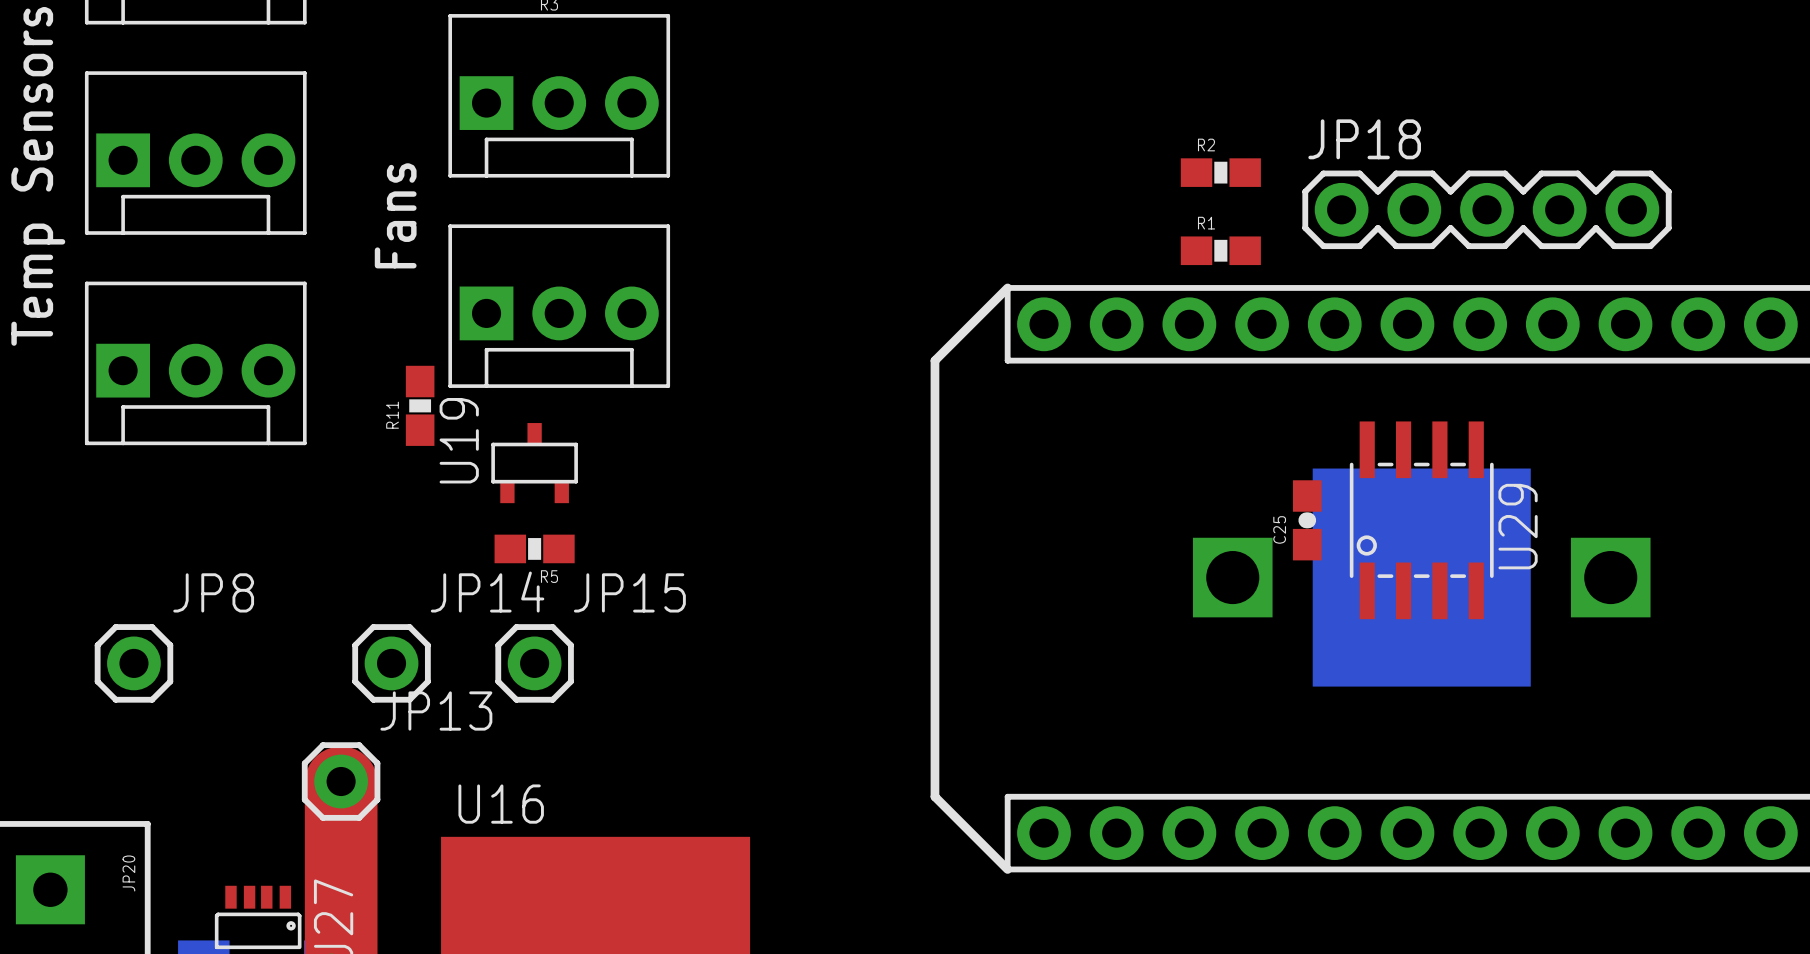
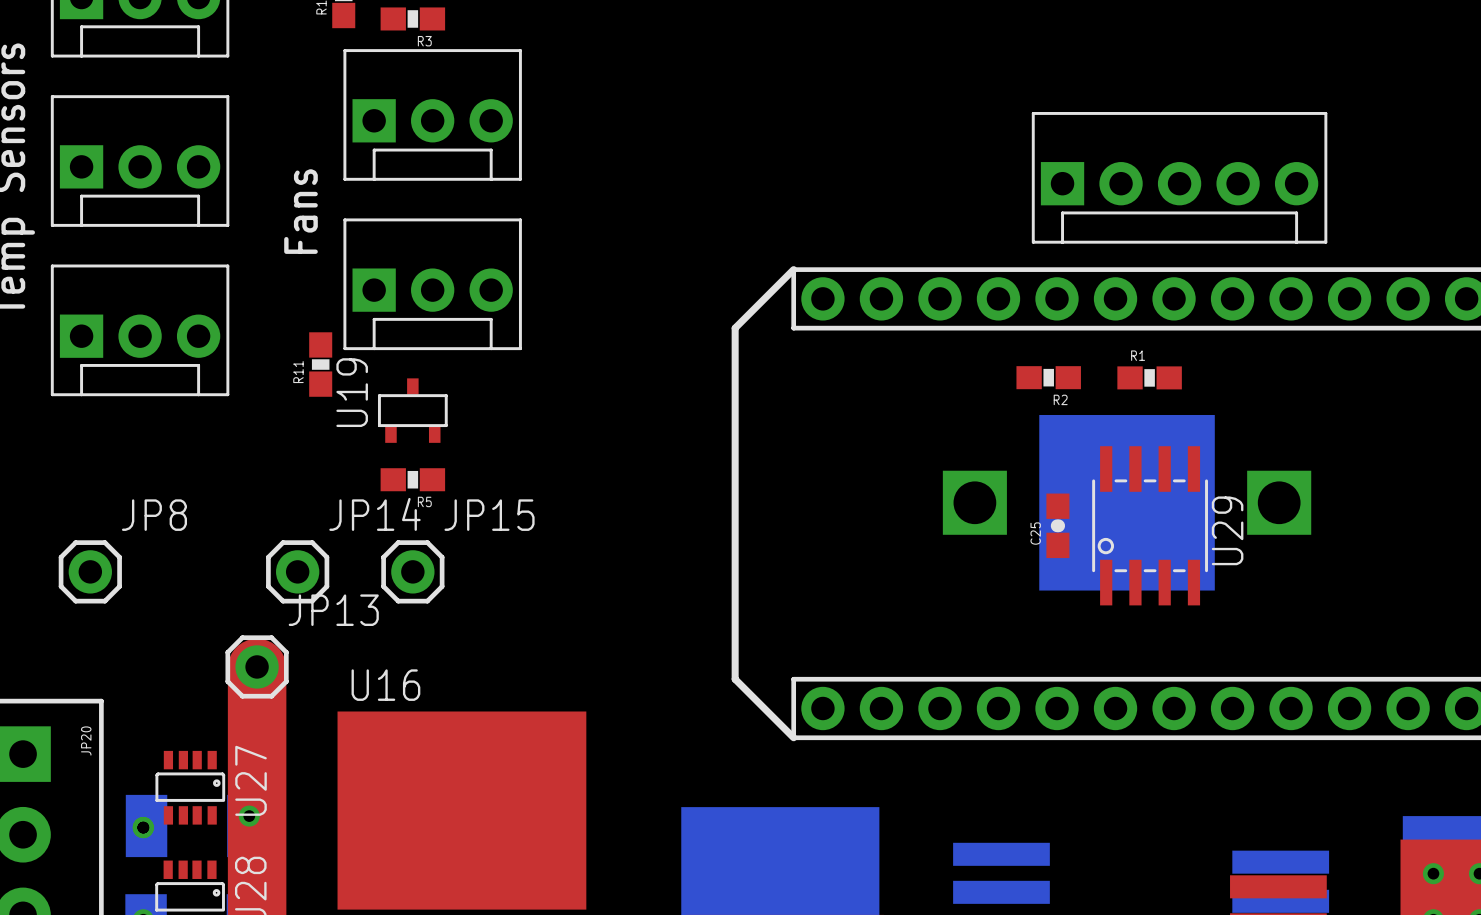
R2 name position: R2 (1206, 145) -> R2 (1060, 399)
R2 position: (1220, 172) -> (1048, 377)
part: none -> (1179, 177)
JP18: (1486, 209) -> none
R1 position: (1220, 250) -> (1149, 377)
C25 position: (1307, 520) -> (1057, 525)
U29 position: (1421, 520) -> (1150, 525)

